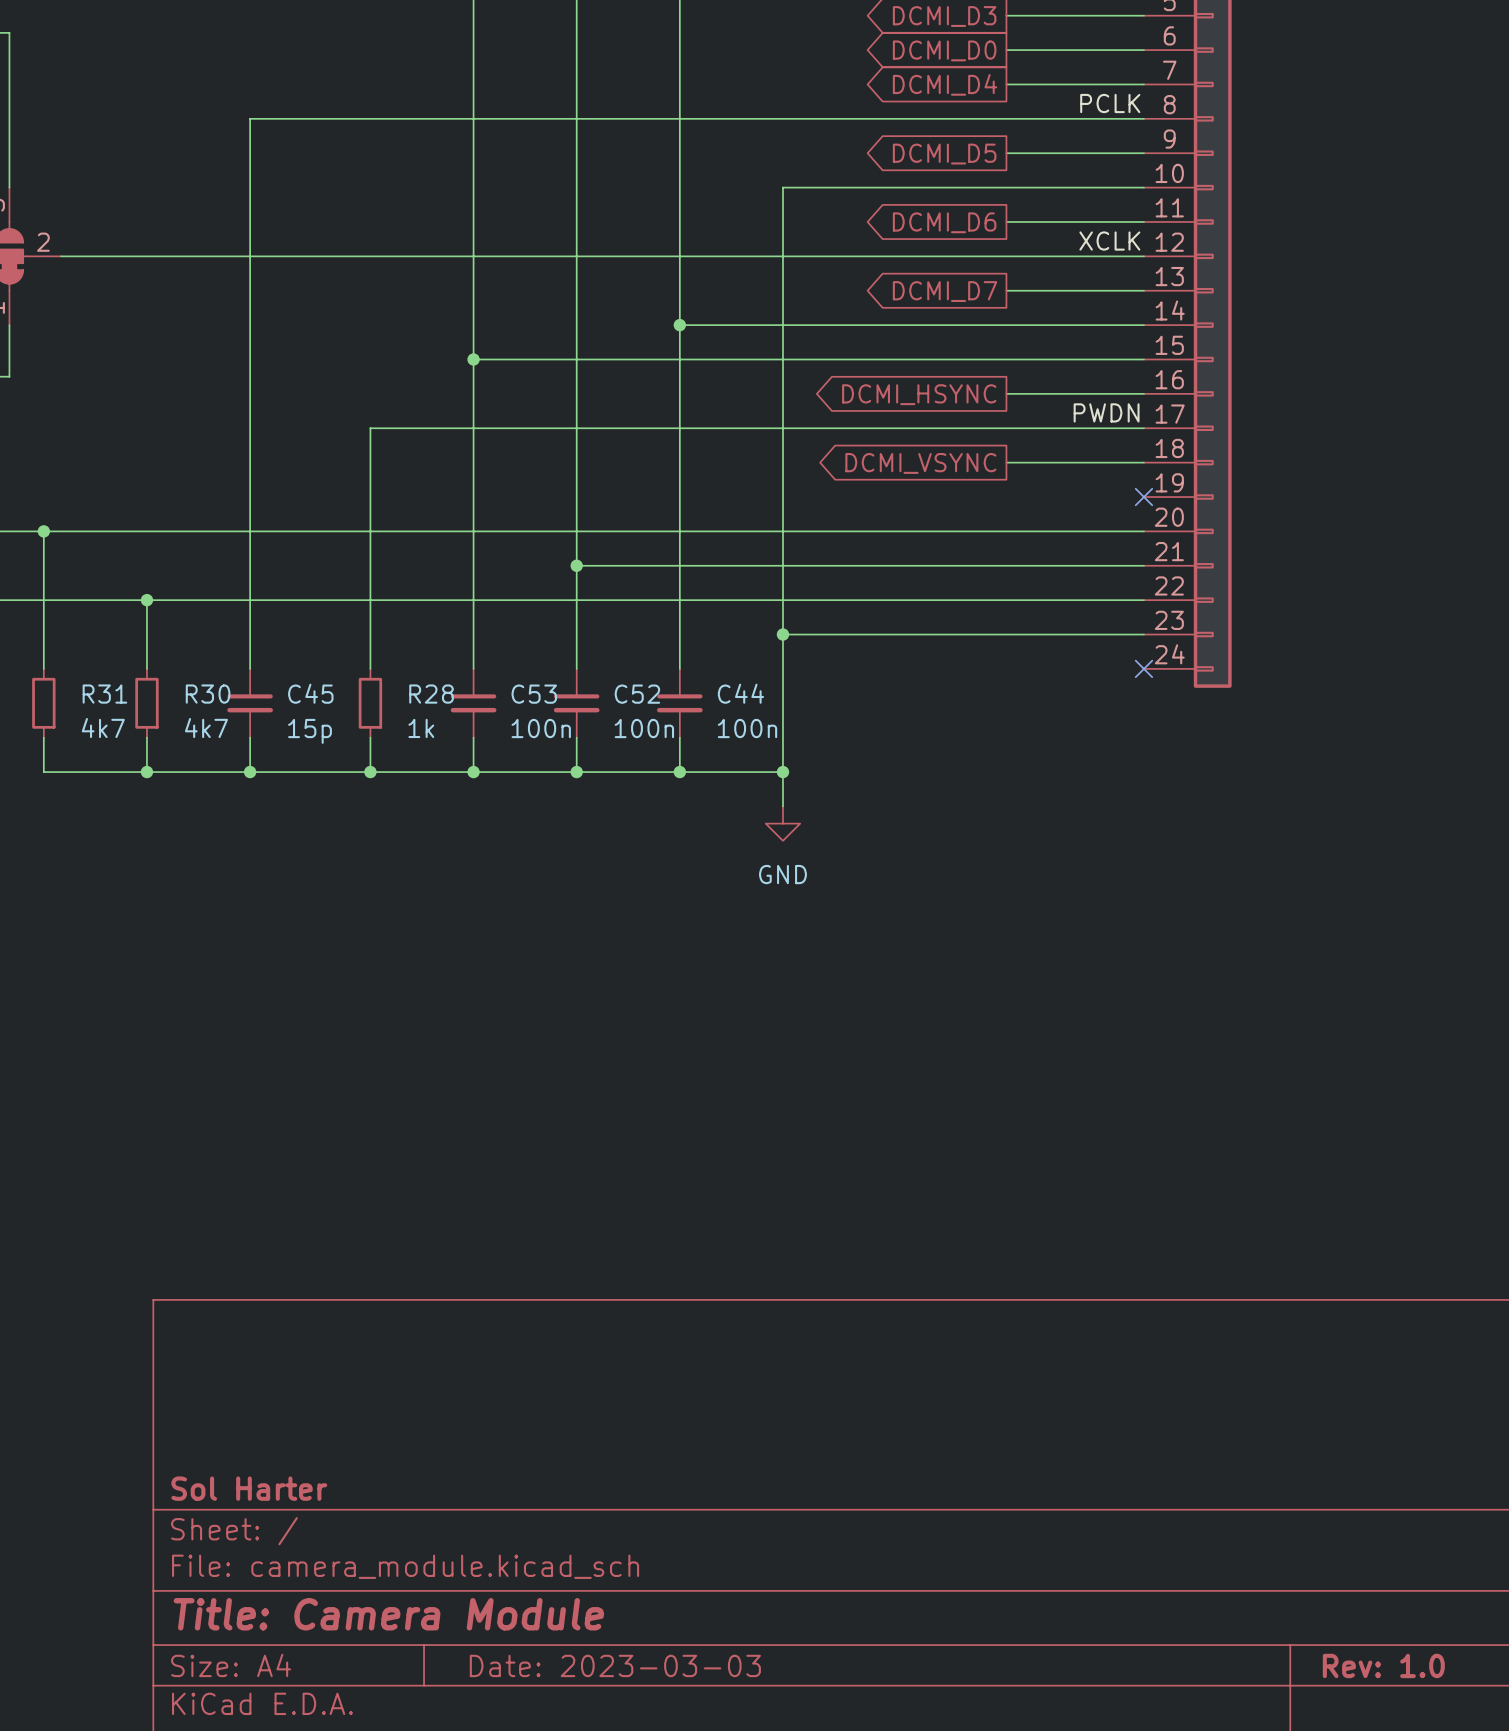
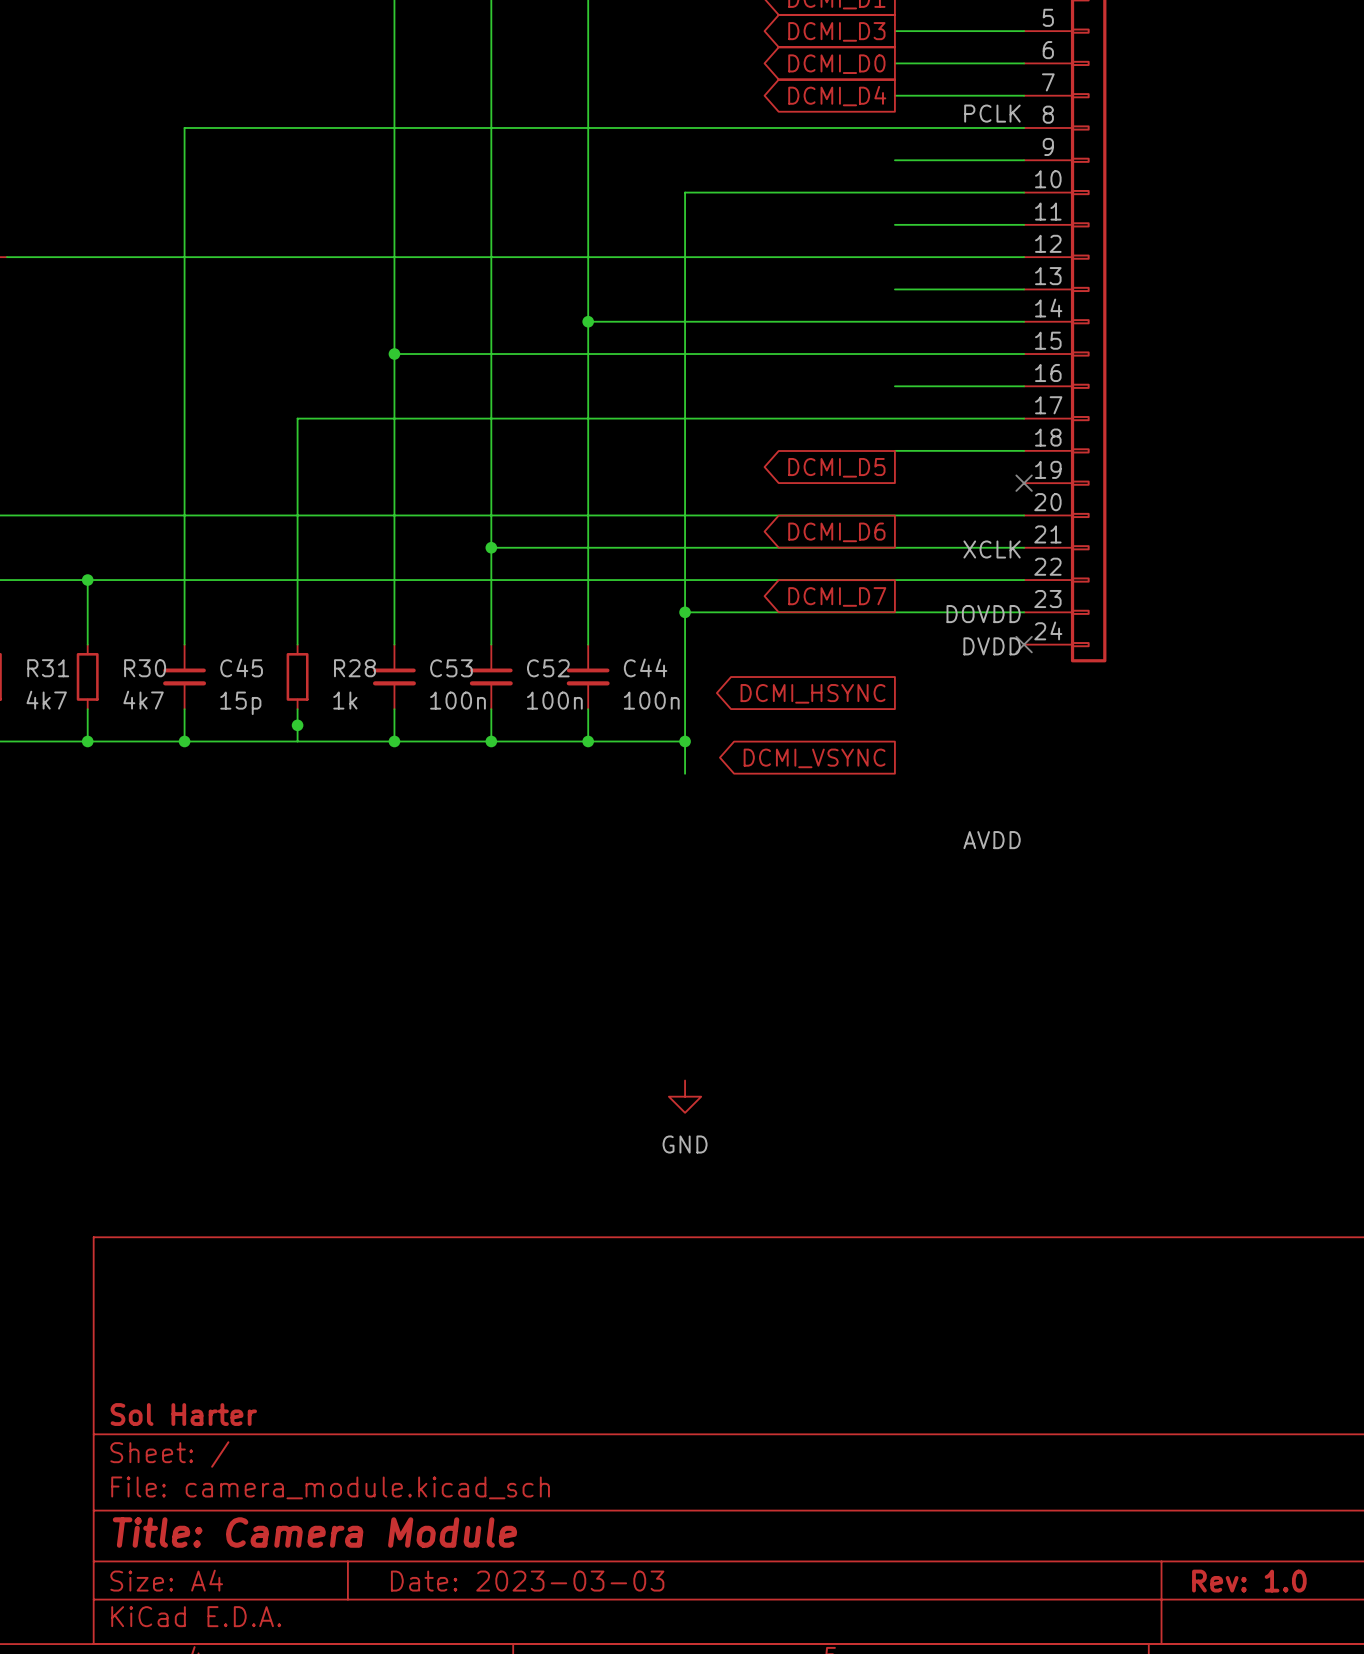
global label position: DCMI_D5 (944, 154) -> DCMI_D5 (836, 467)
global label position: DCMI_D6 (944, 222) -> DCMI_D6 (836, 532)
label position: XCLK (1109, 241) -> XCLK (992, 549)
global label position: DCMI_D7 (945, 291) -> DCMI_D7 (837, 596)
global label position: DCMI_HSYNC (919, 394) -> DCMI_HSYNC (813, 693)
label: PWDN (1106, 412) -> none
global label position: DCMI_VSYNC (920, 463) -> DCMI_VSYNC (814, 758)
label: none -> DOVDD (983, 614)
label: none -> DVDD (992, 646)
junction position: (370, 772) -> (297, 725)
power symbol position: GND (782, 823) -> GND (685, 1096)
label: none -> AVDD (992, 840)

